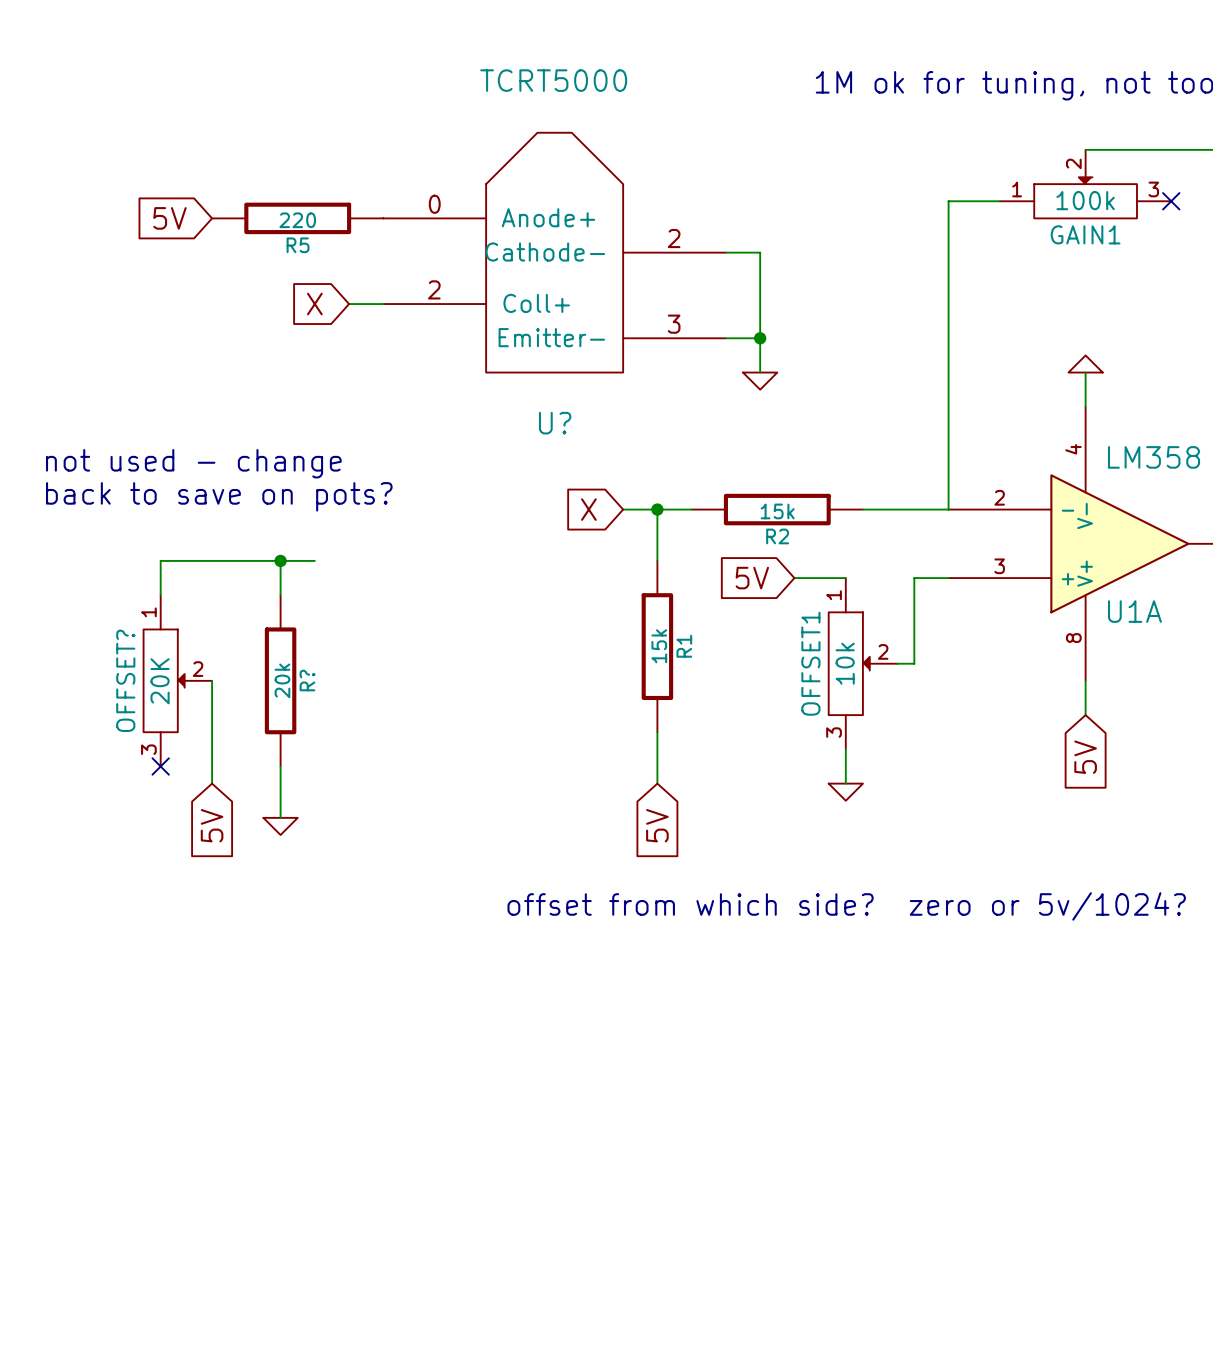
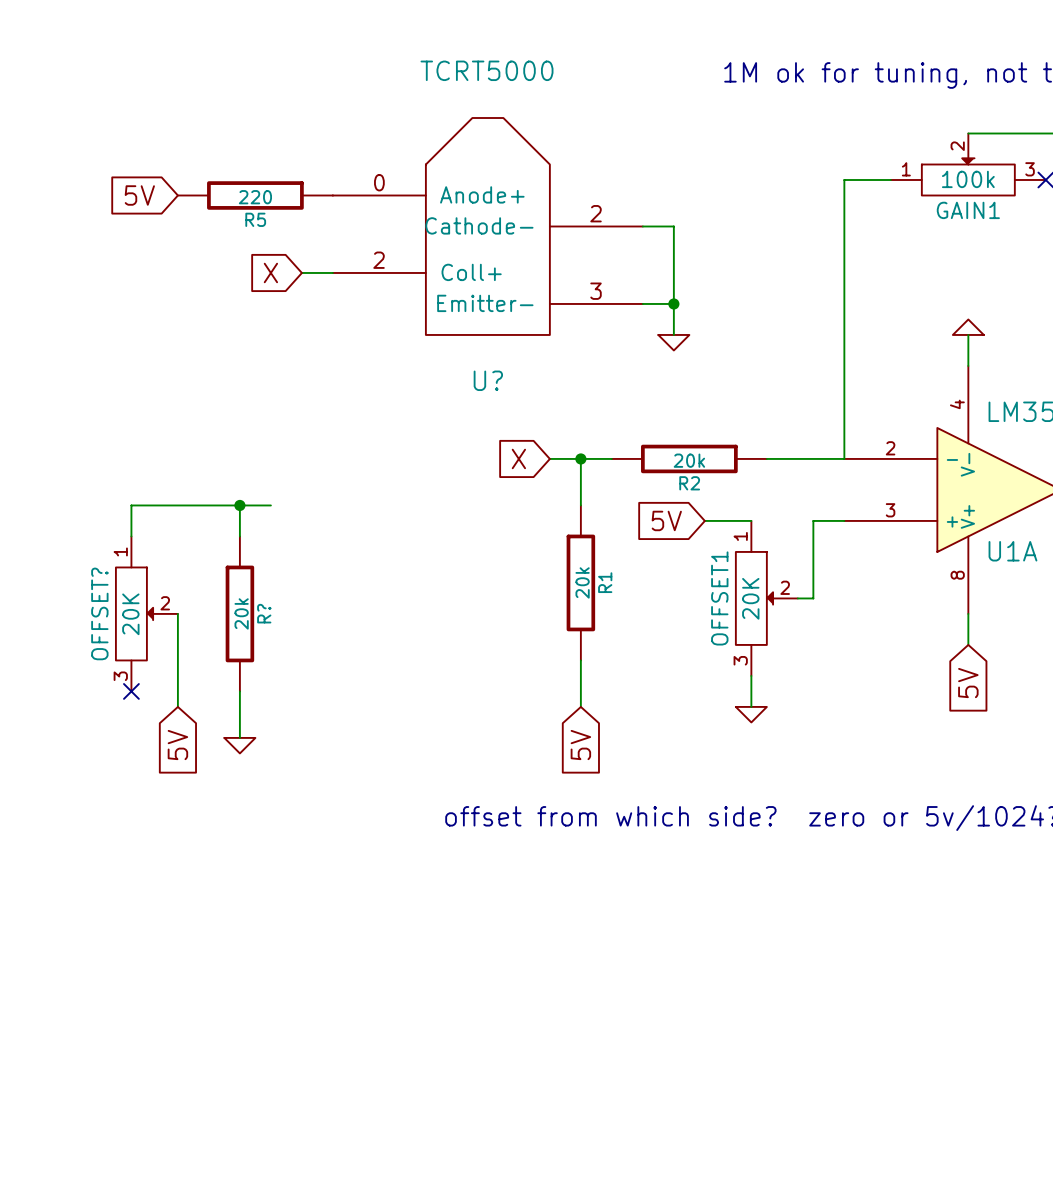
text: not used - change (193, 463) -> none
text: back to save on pots? (219, 496) -> none
R2 value: 15k (777, 511) -> 20k (689, 460)
R1 value: 15k (659, 646) -> 20k (582, 582)
OFFSET1 value: 10k (845, 663) -> 20K (750, 598)

